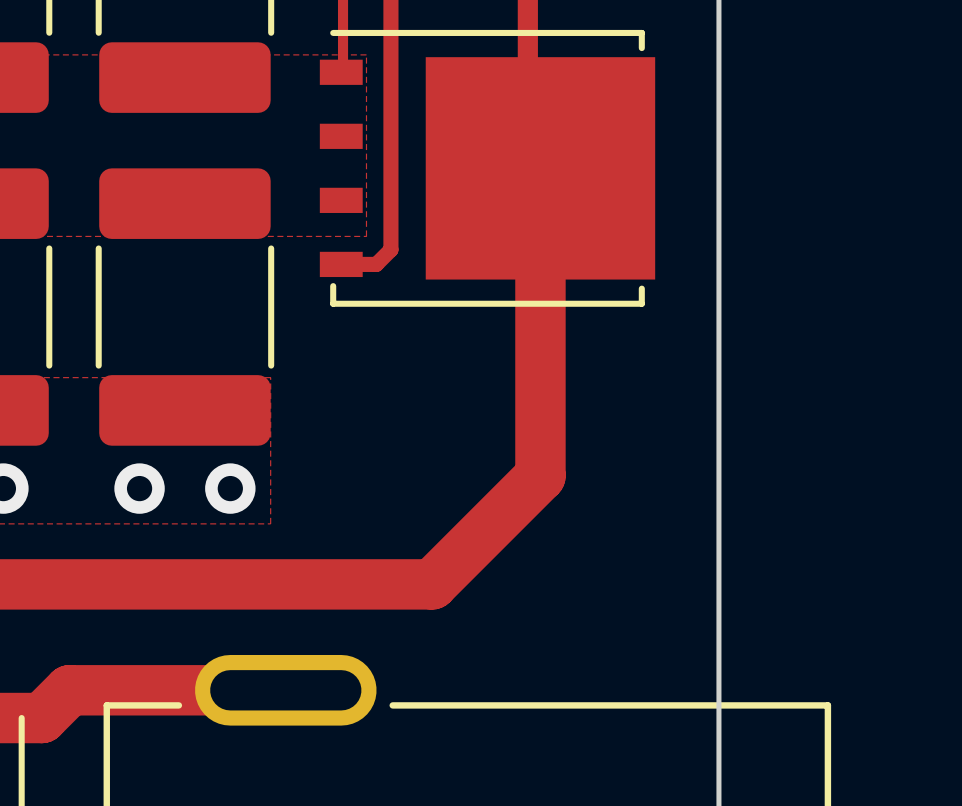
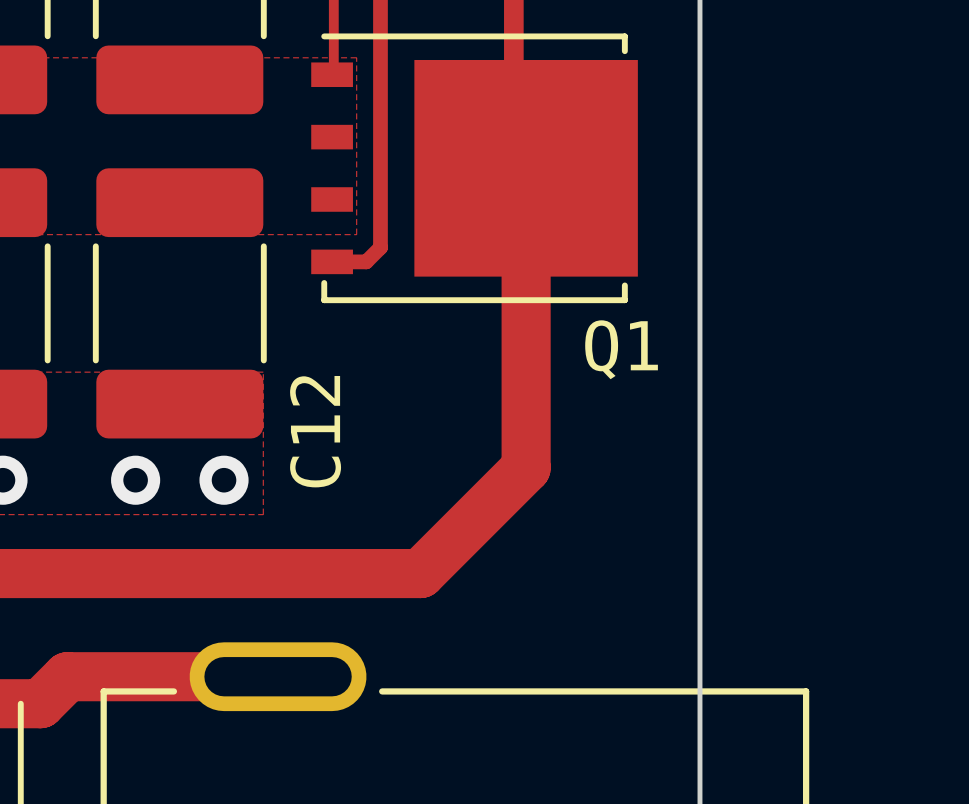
Q1 name: none -> Q1 (621, 349)
C12 name: none -> C12 (315, 431)

